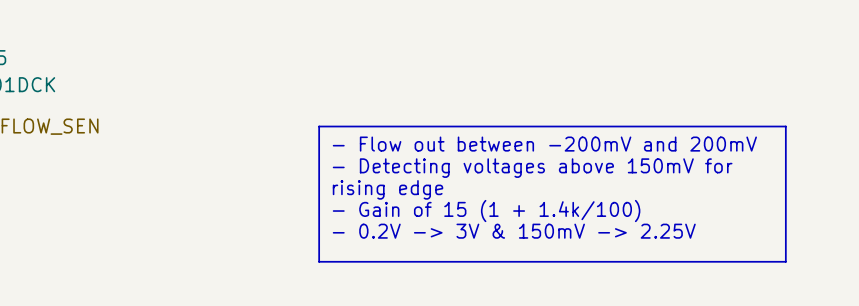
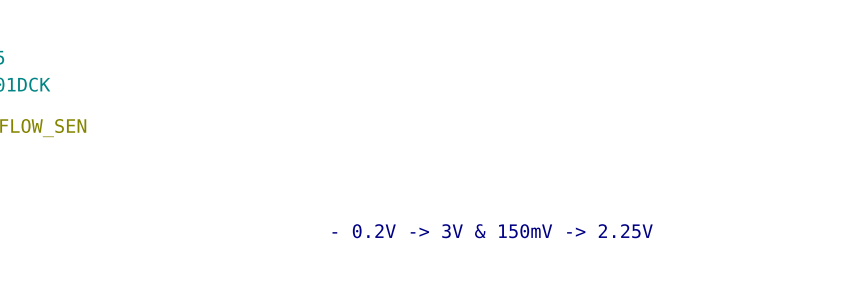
line: (319, 126) (785, 126) (785, 261) (319, 261) (319, 126) -> none
text: - Flow out between -200mV and 200mV (544, 144) -> none
text: - Detecting voltages above 150mV for (532, 168) -> none
text: rising edge (388, 189) -> none
text: - Gain of 15 (1 + 1.4k/100) (486, 211) -> none

